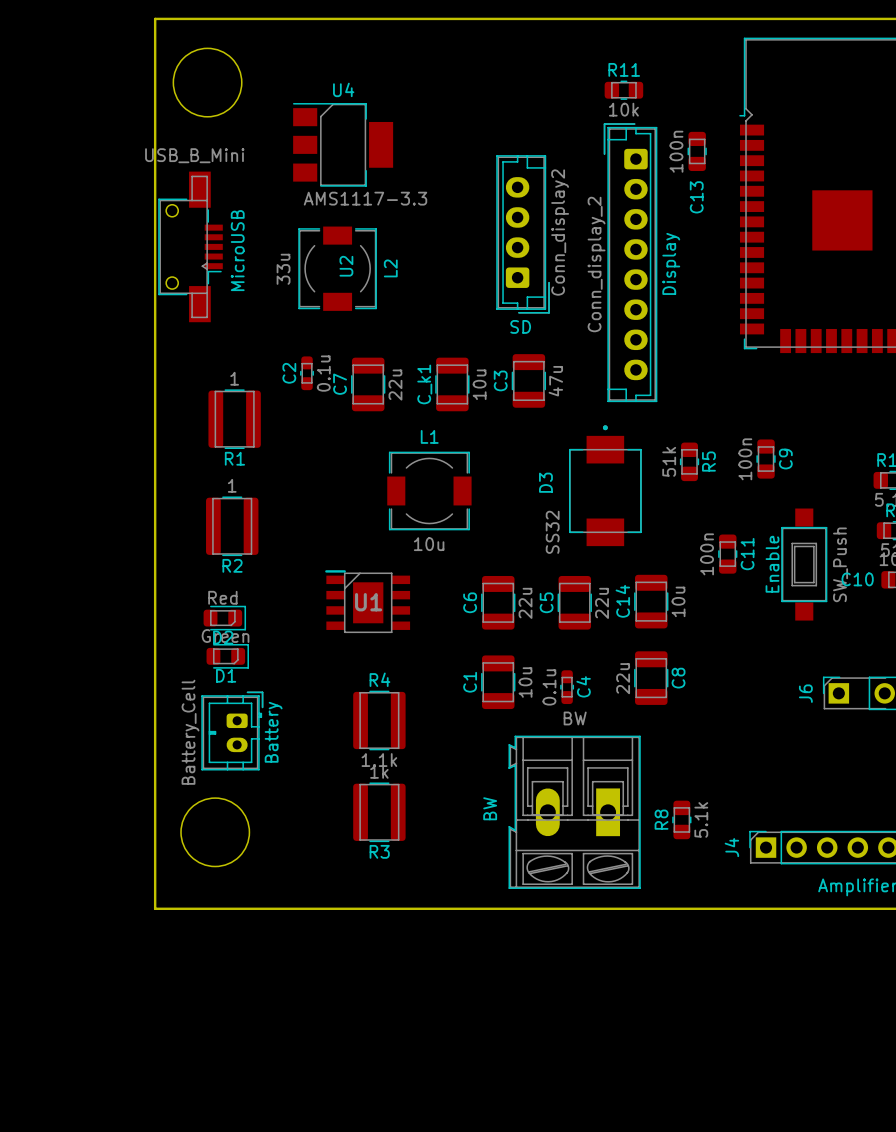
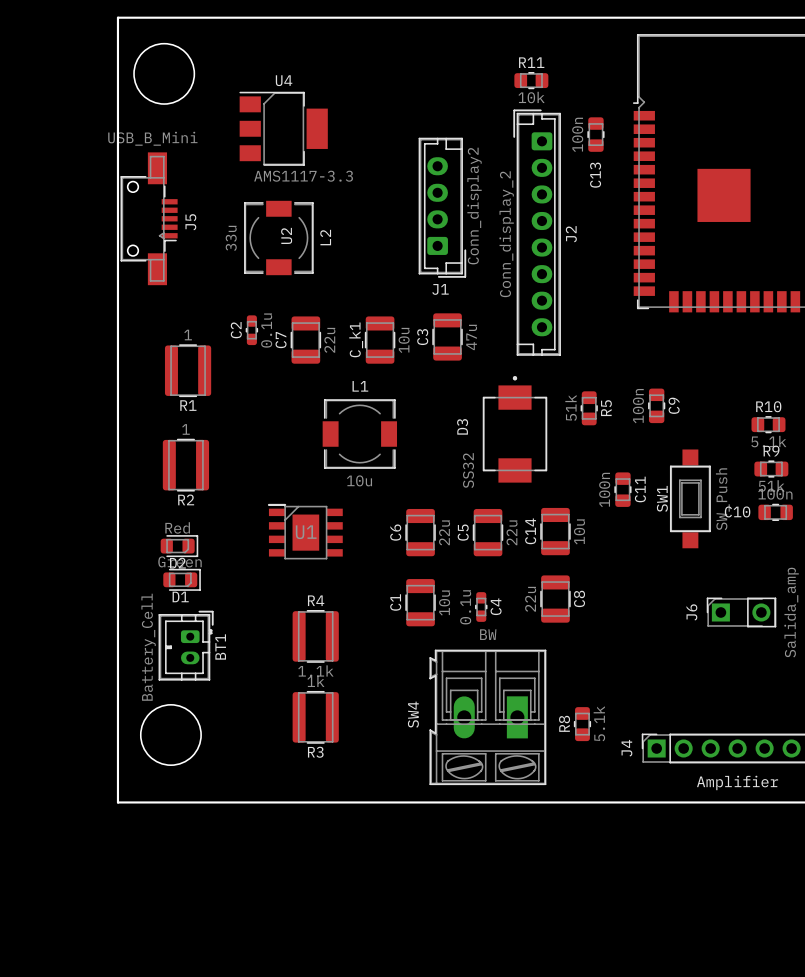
MicroUSB name: MicroUSB (237, 250) -> J5 (190, 222)
Display name: Display (671, 263) -> J2 (571, 234)
SD name: SD (520, 326) -> J1 (440, 289)
Enable name: Enable (772, 564) -> SW1 (662, 498)
Battery name: Battery (273, 732) -> BT1 (220, 646)
BW name: BW (490, 808) -> SW4 (413, 714)

